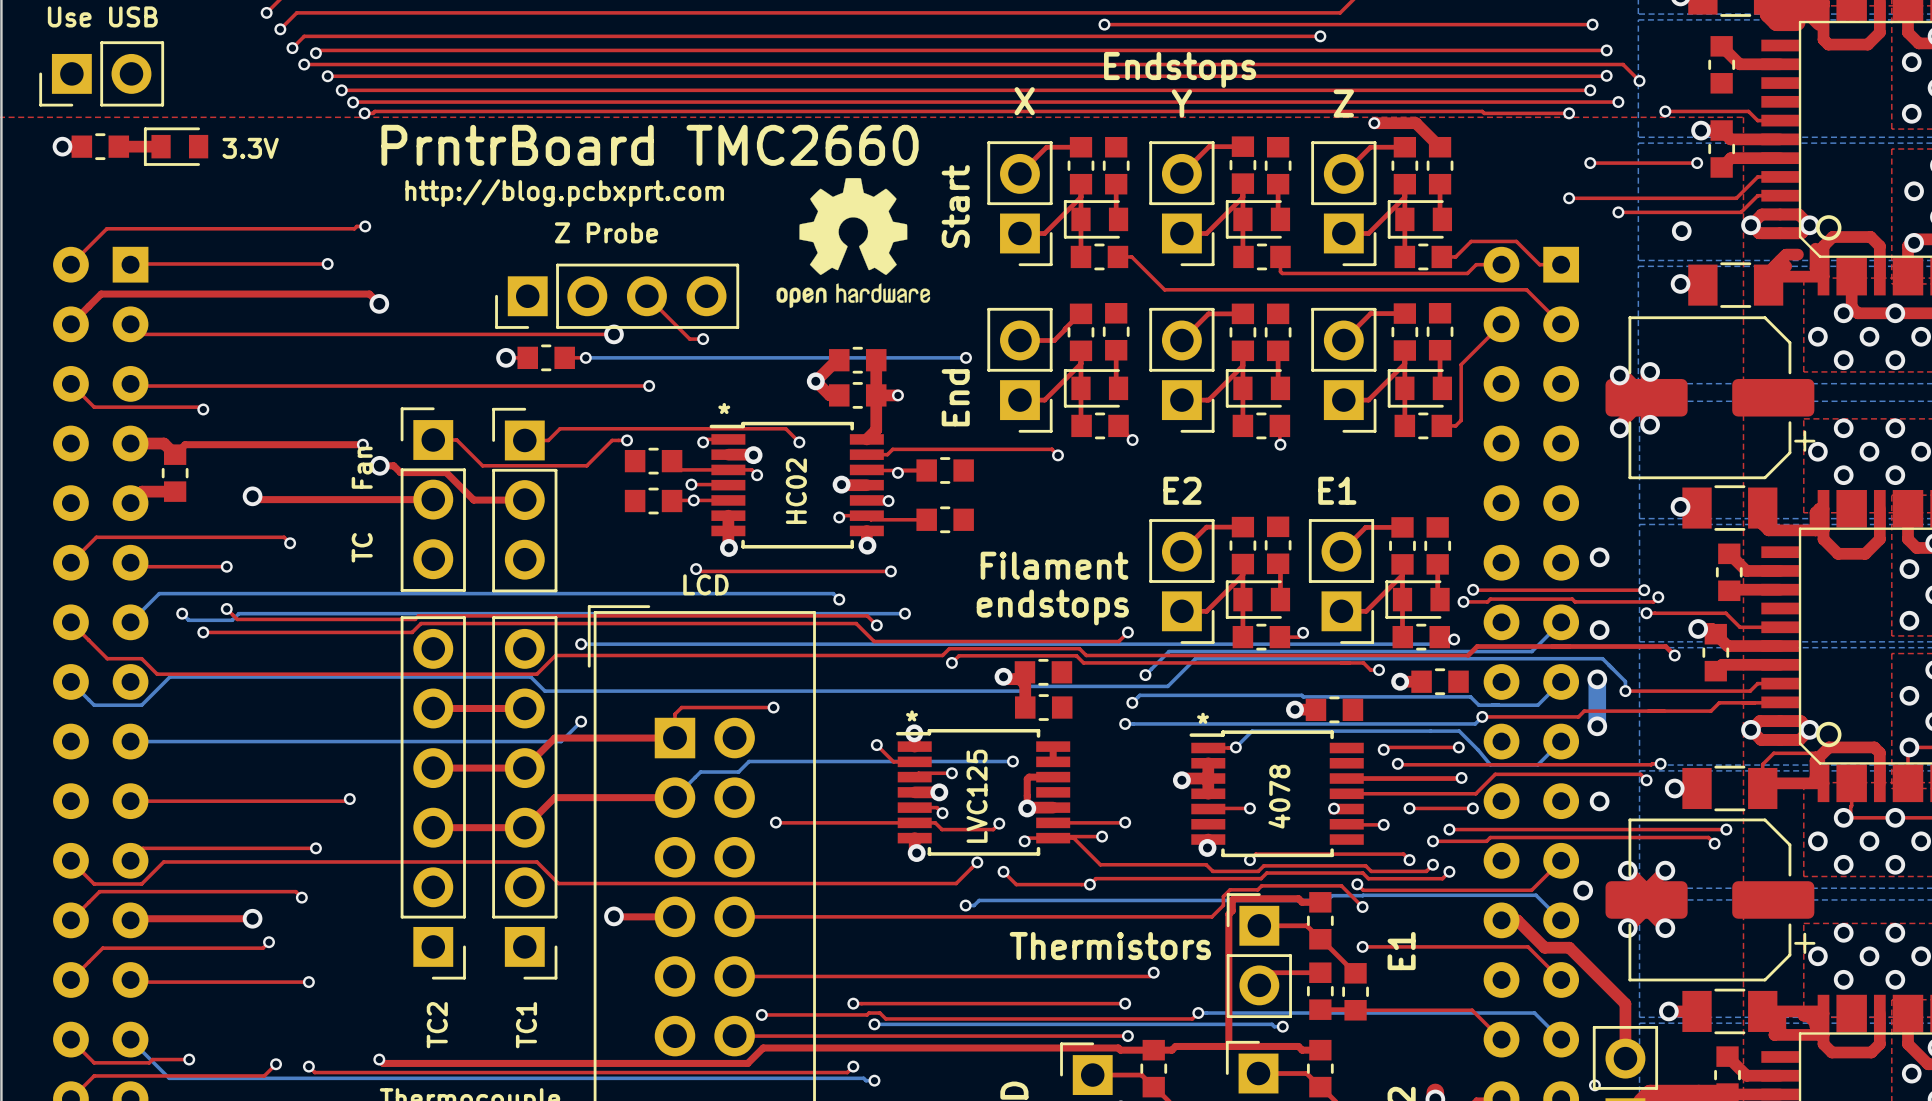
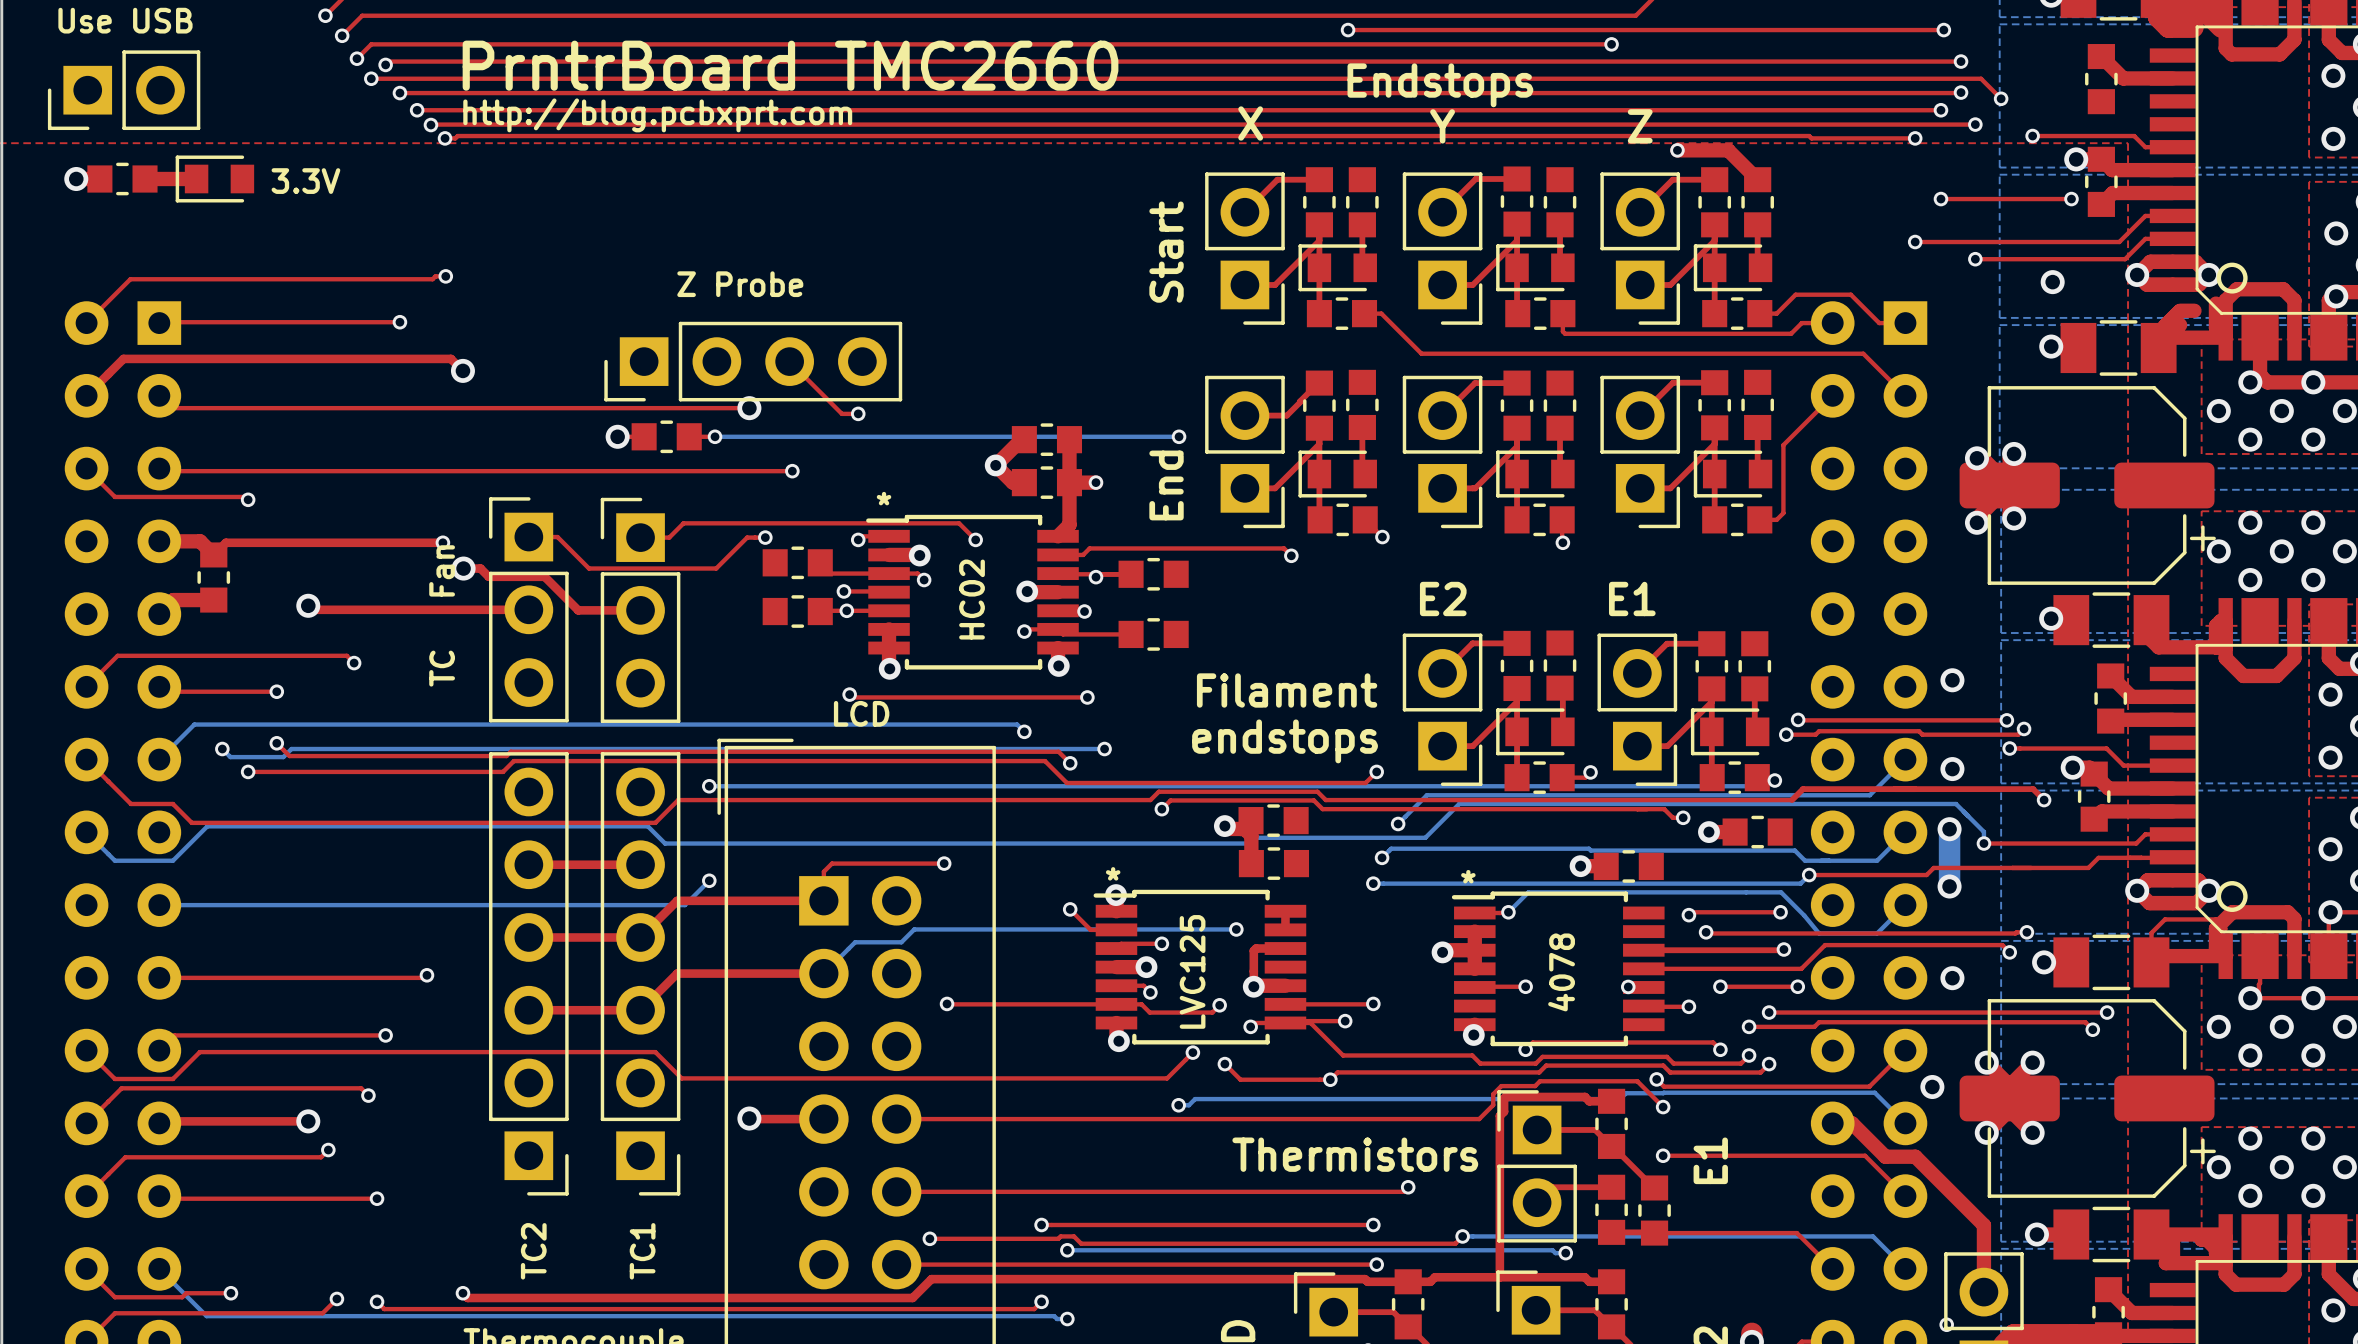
text position: PrntrBoard TMC2660 (650, 145) -> PrntrBoard TMC2660 (790, 65)
drawing: [776, 178, 931, 309] -> none
text position: http://blog.pcbxprt.com (564, 193) -> http://blog.pcbxprt.com (657, 115)

